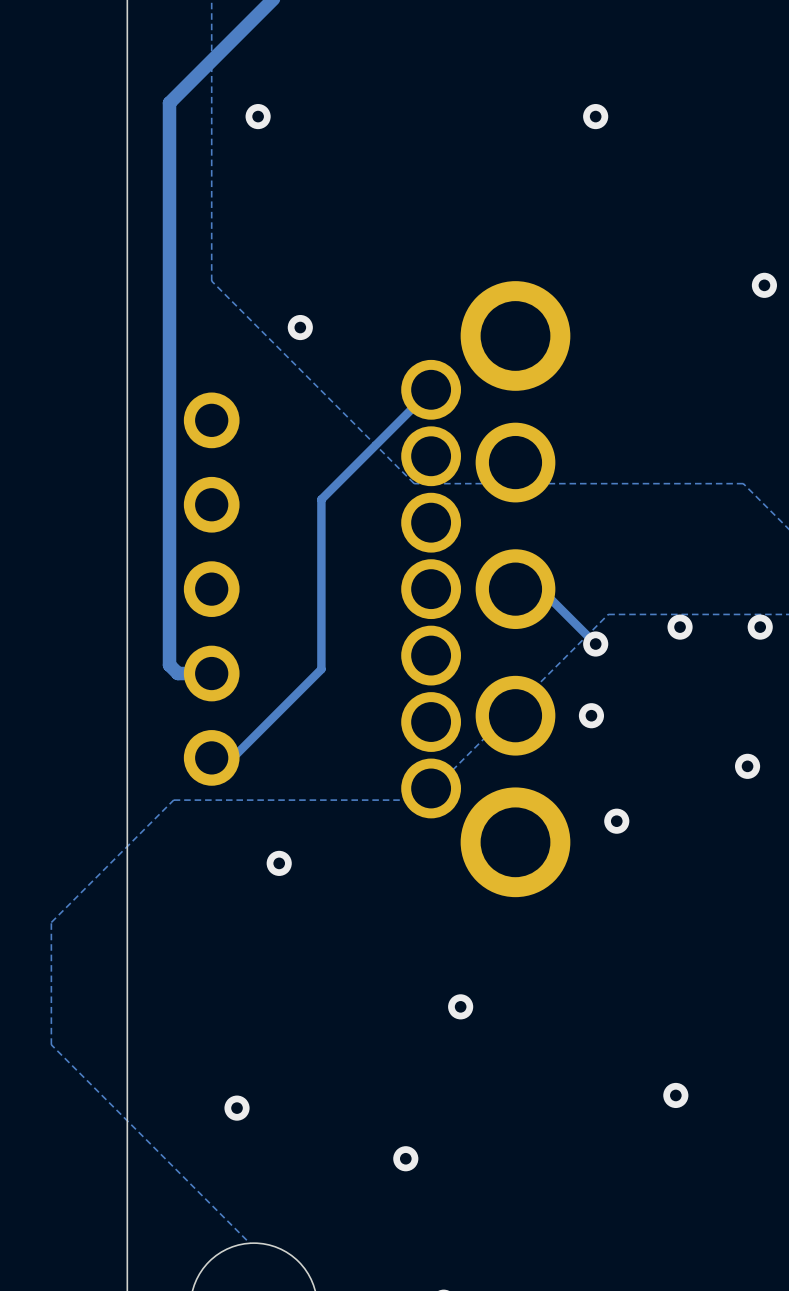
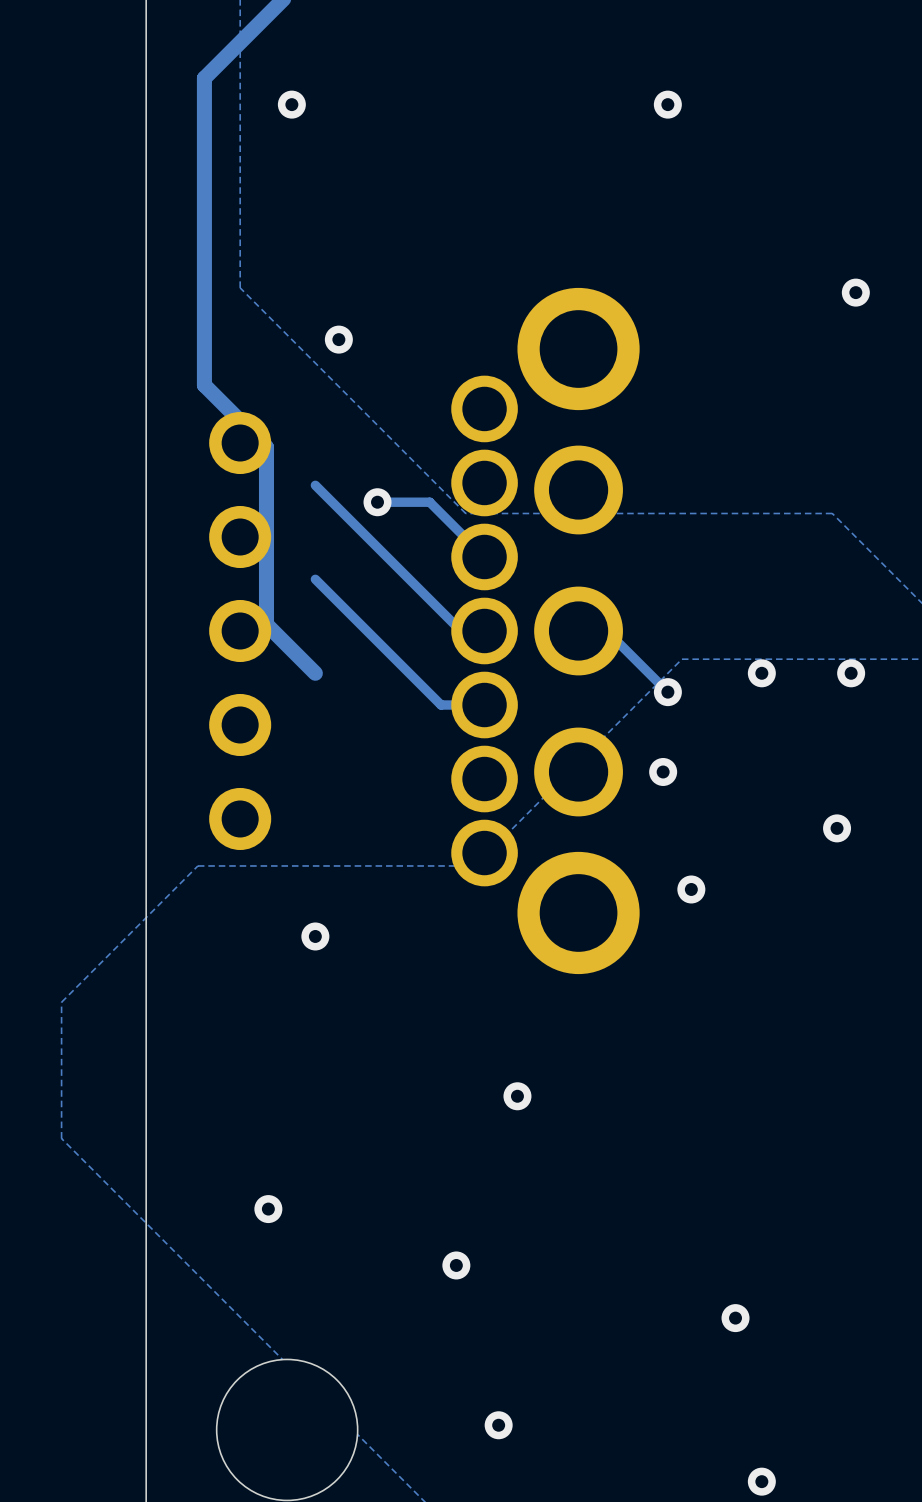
track: (179, 92) (169, 103) (169, 665) (177, 673) (211, 673) -> (204, 78) (204, 385) (266, 447) (266, 624) (315, 673)
track: (431, 389) (321, 499) (321, 669) (232, 757) (211, 757) -> none
track: none -> (315, 485) (461, 630) (484, 630)
track: none -> (377, 502) (429, 502) (484, 556)
via: none -> (377, 502)
track: none -> (315, 579) (441, 705) (484, 705)
via position: (675, 1095) -> (735, 1318)

